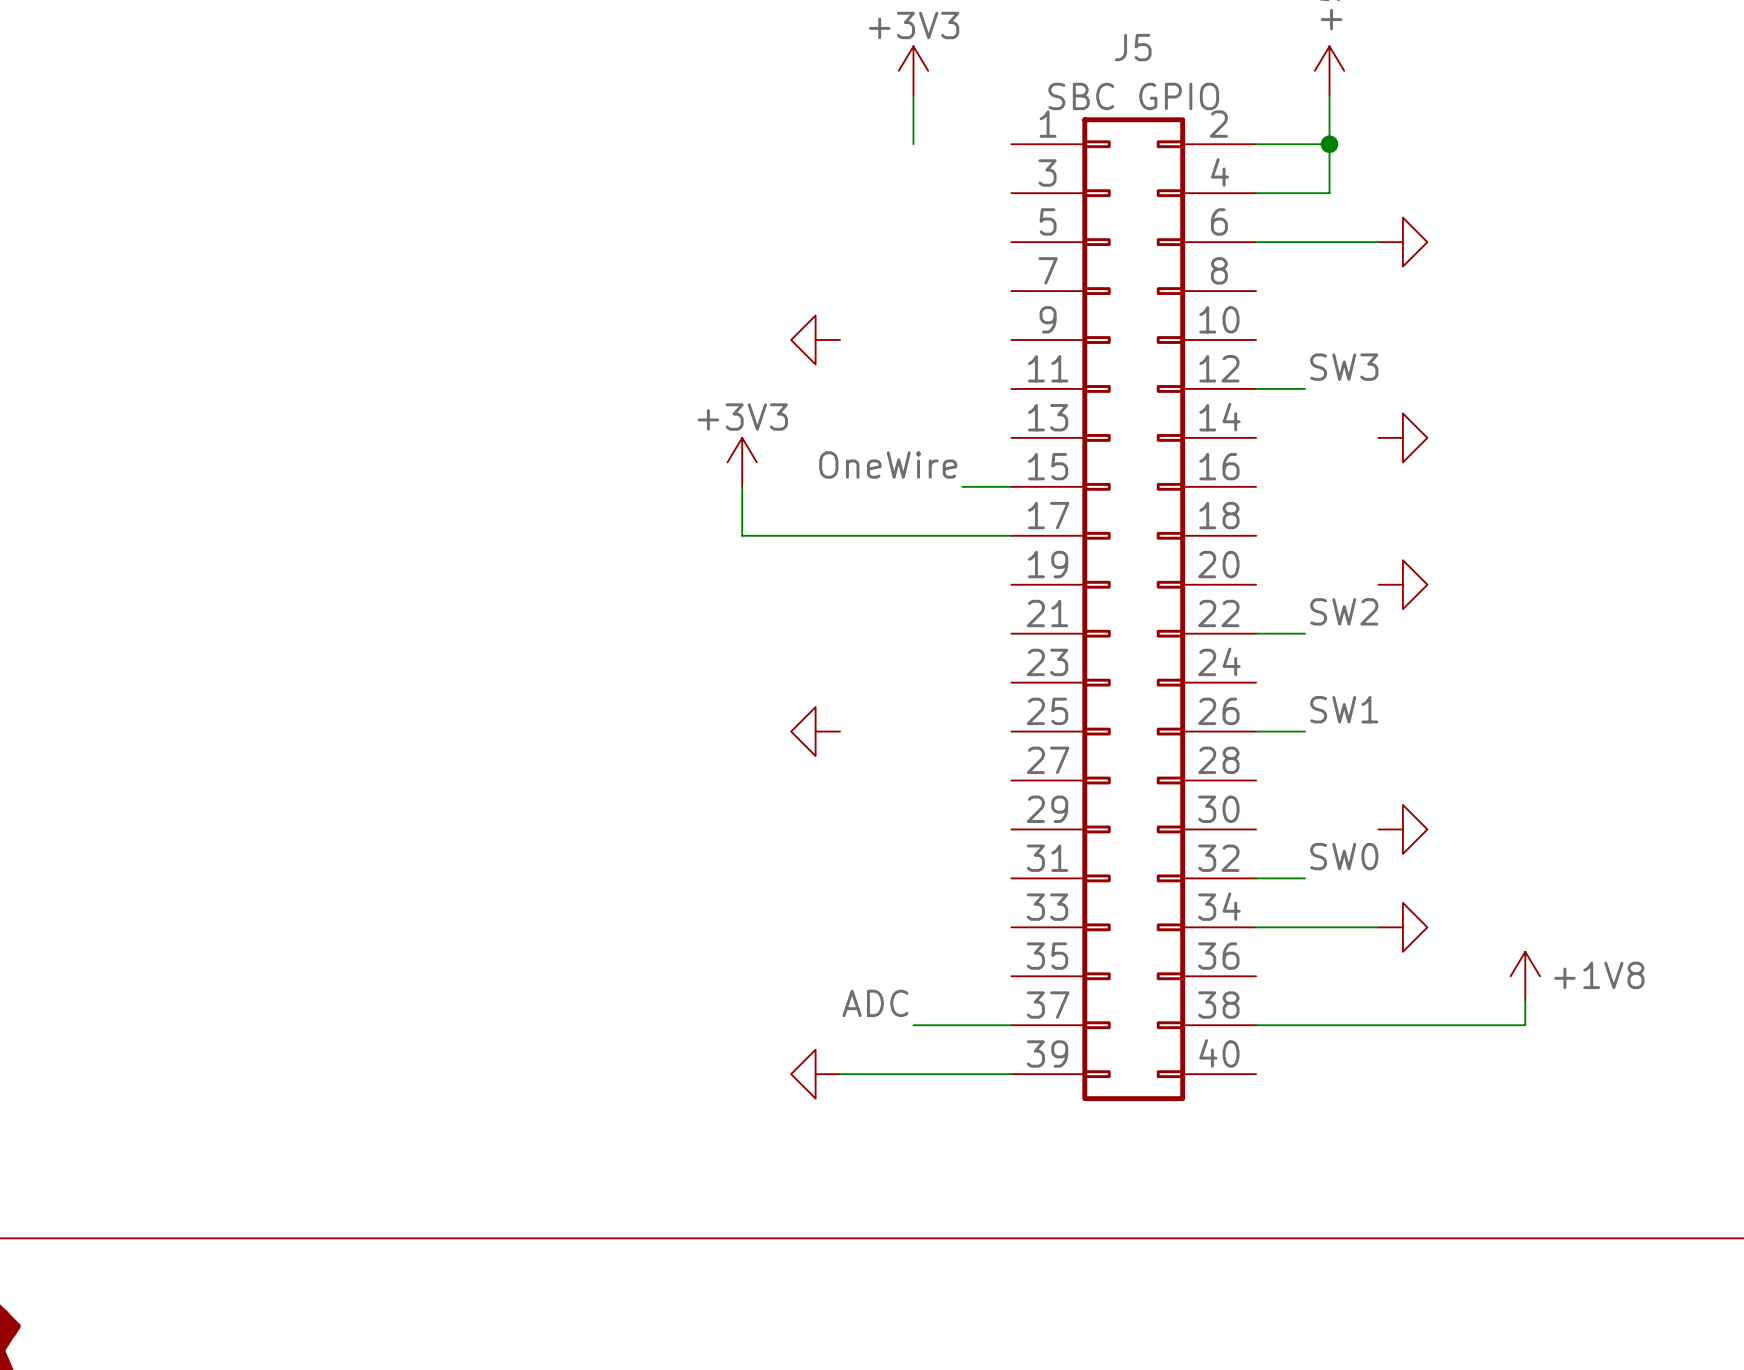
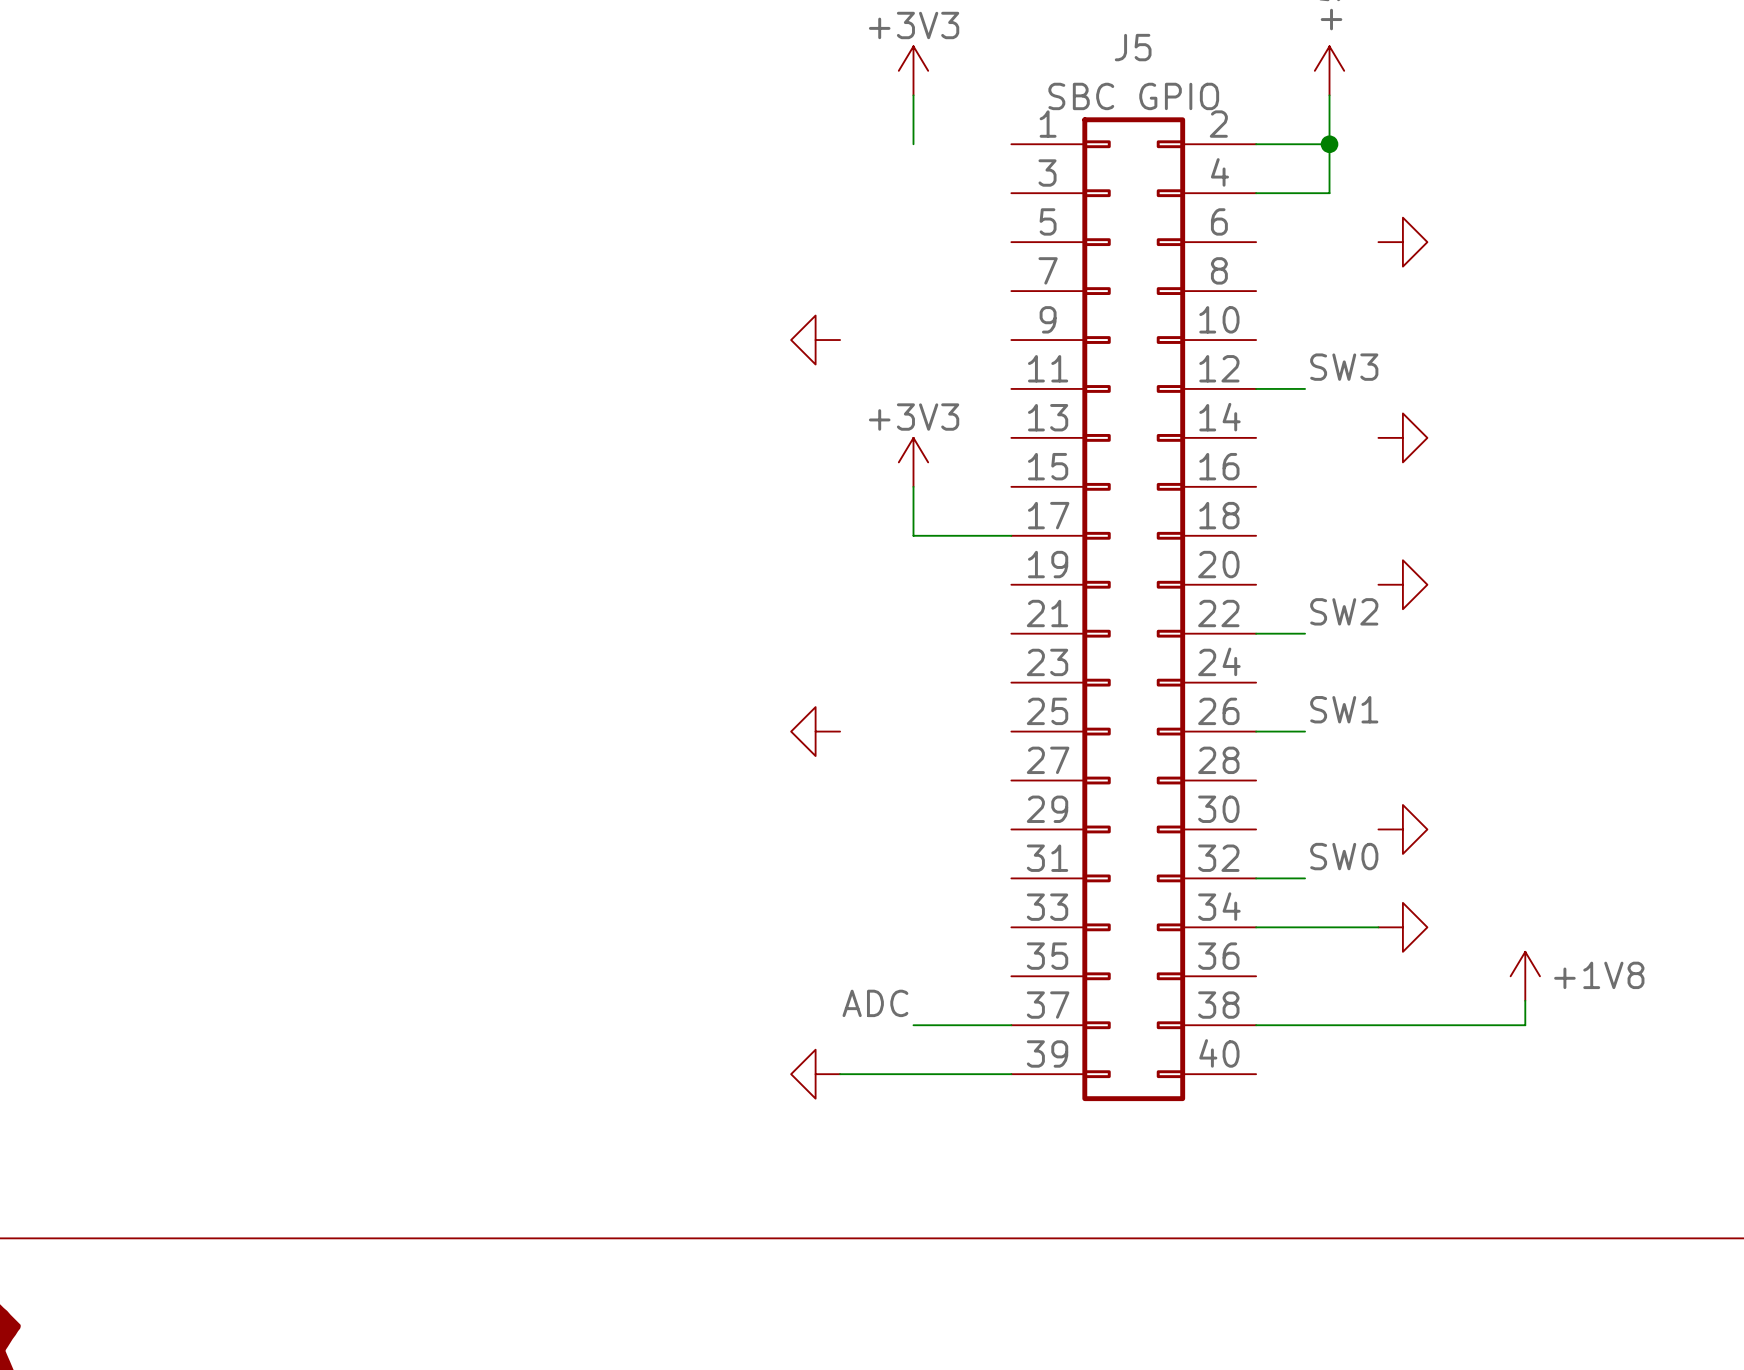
wire: (1256, 242) (1378, 242) -> none
power symbol position: +3V3 (742, 462) -> +3V3 (913, 462)
label: OneWire (888, 465) -> none
wire: (742, 486) (742, 535) (913, 535) -> (913, 486) (913, 535)
wire: (962, 486) (1011, 486) -> none

